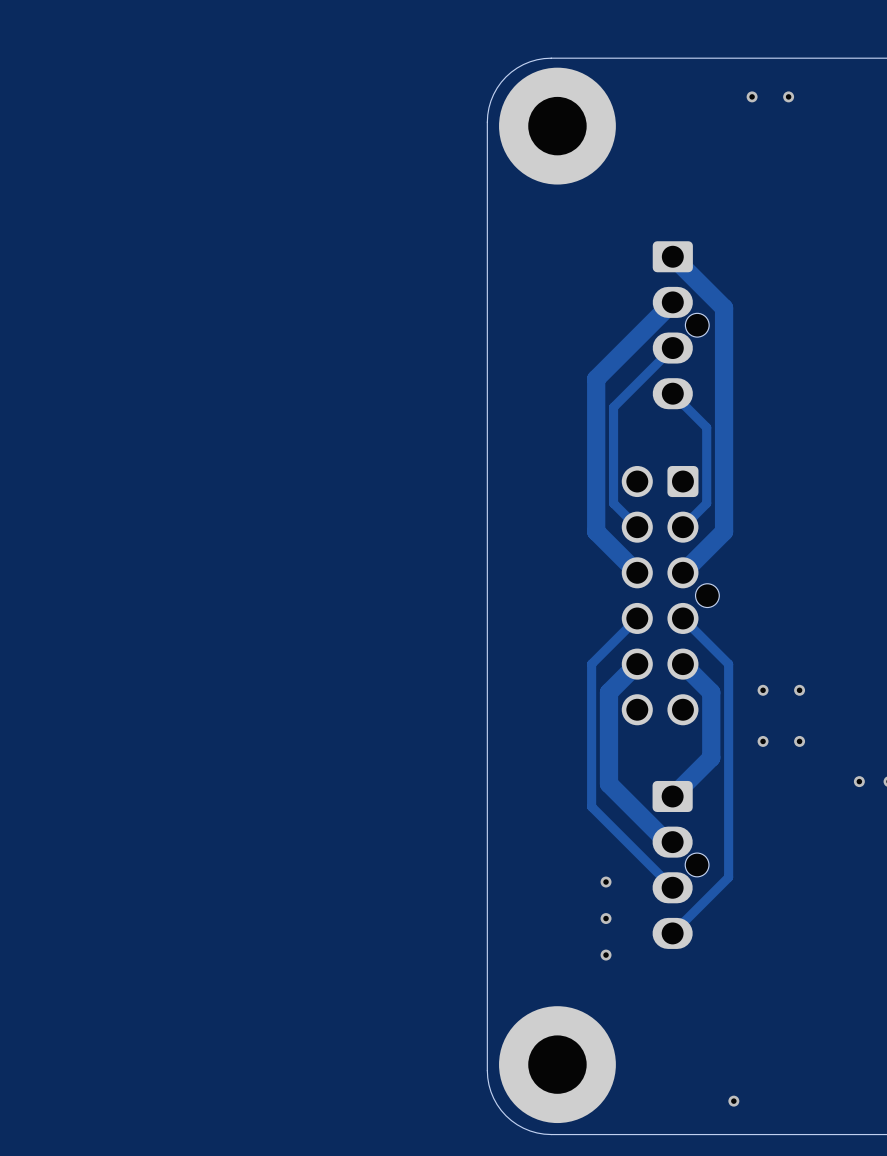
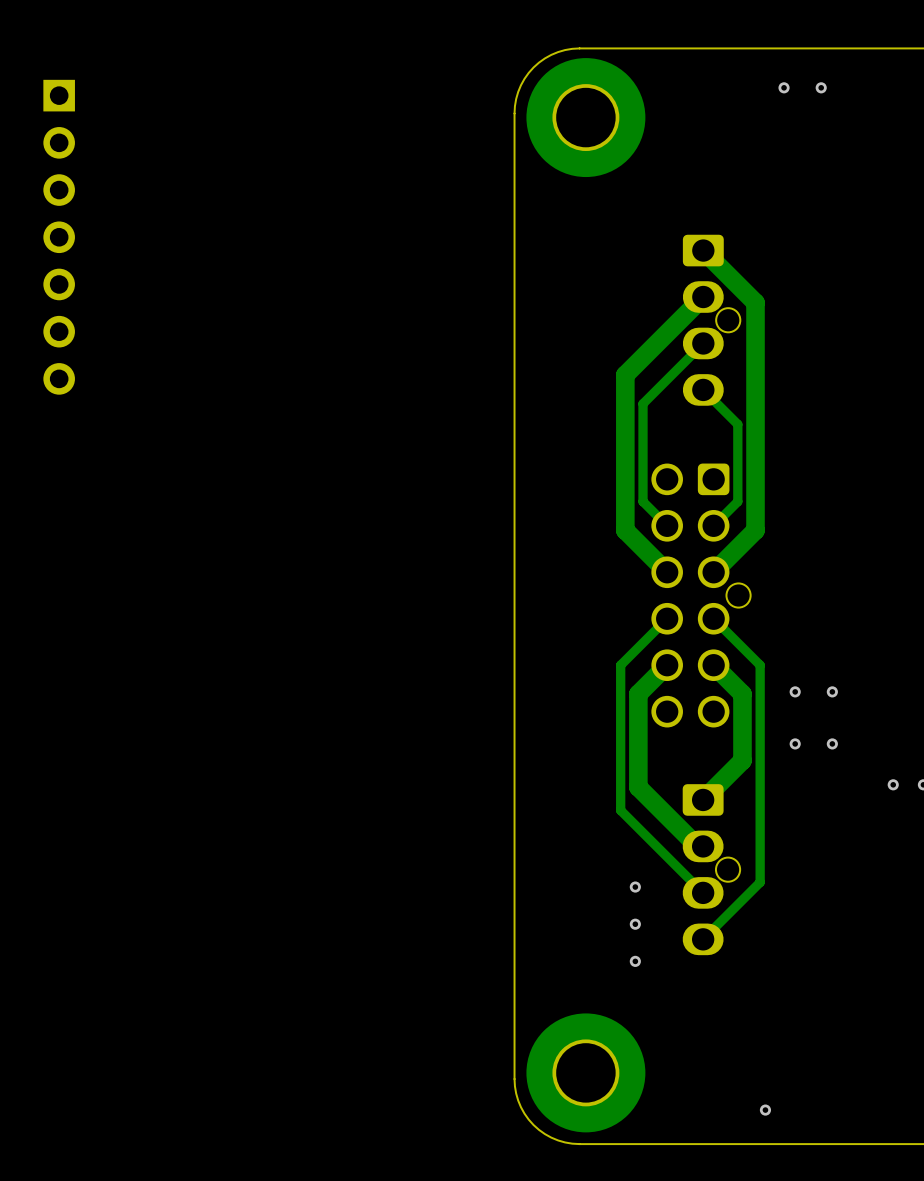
part: none -> (59, 237)

